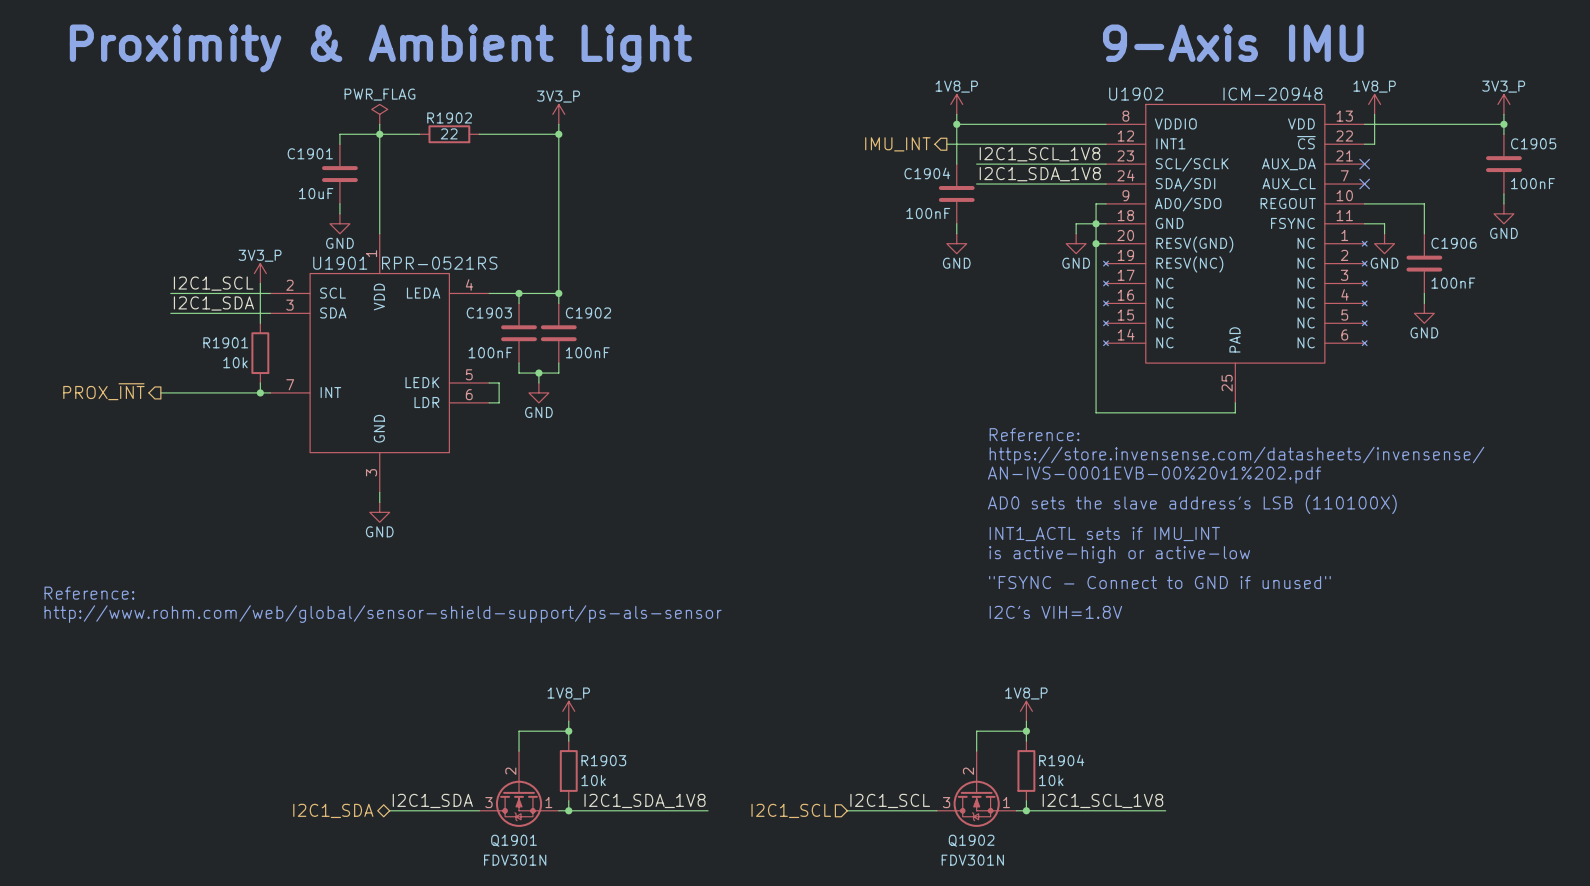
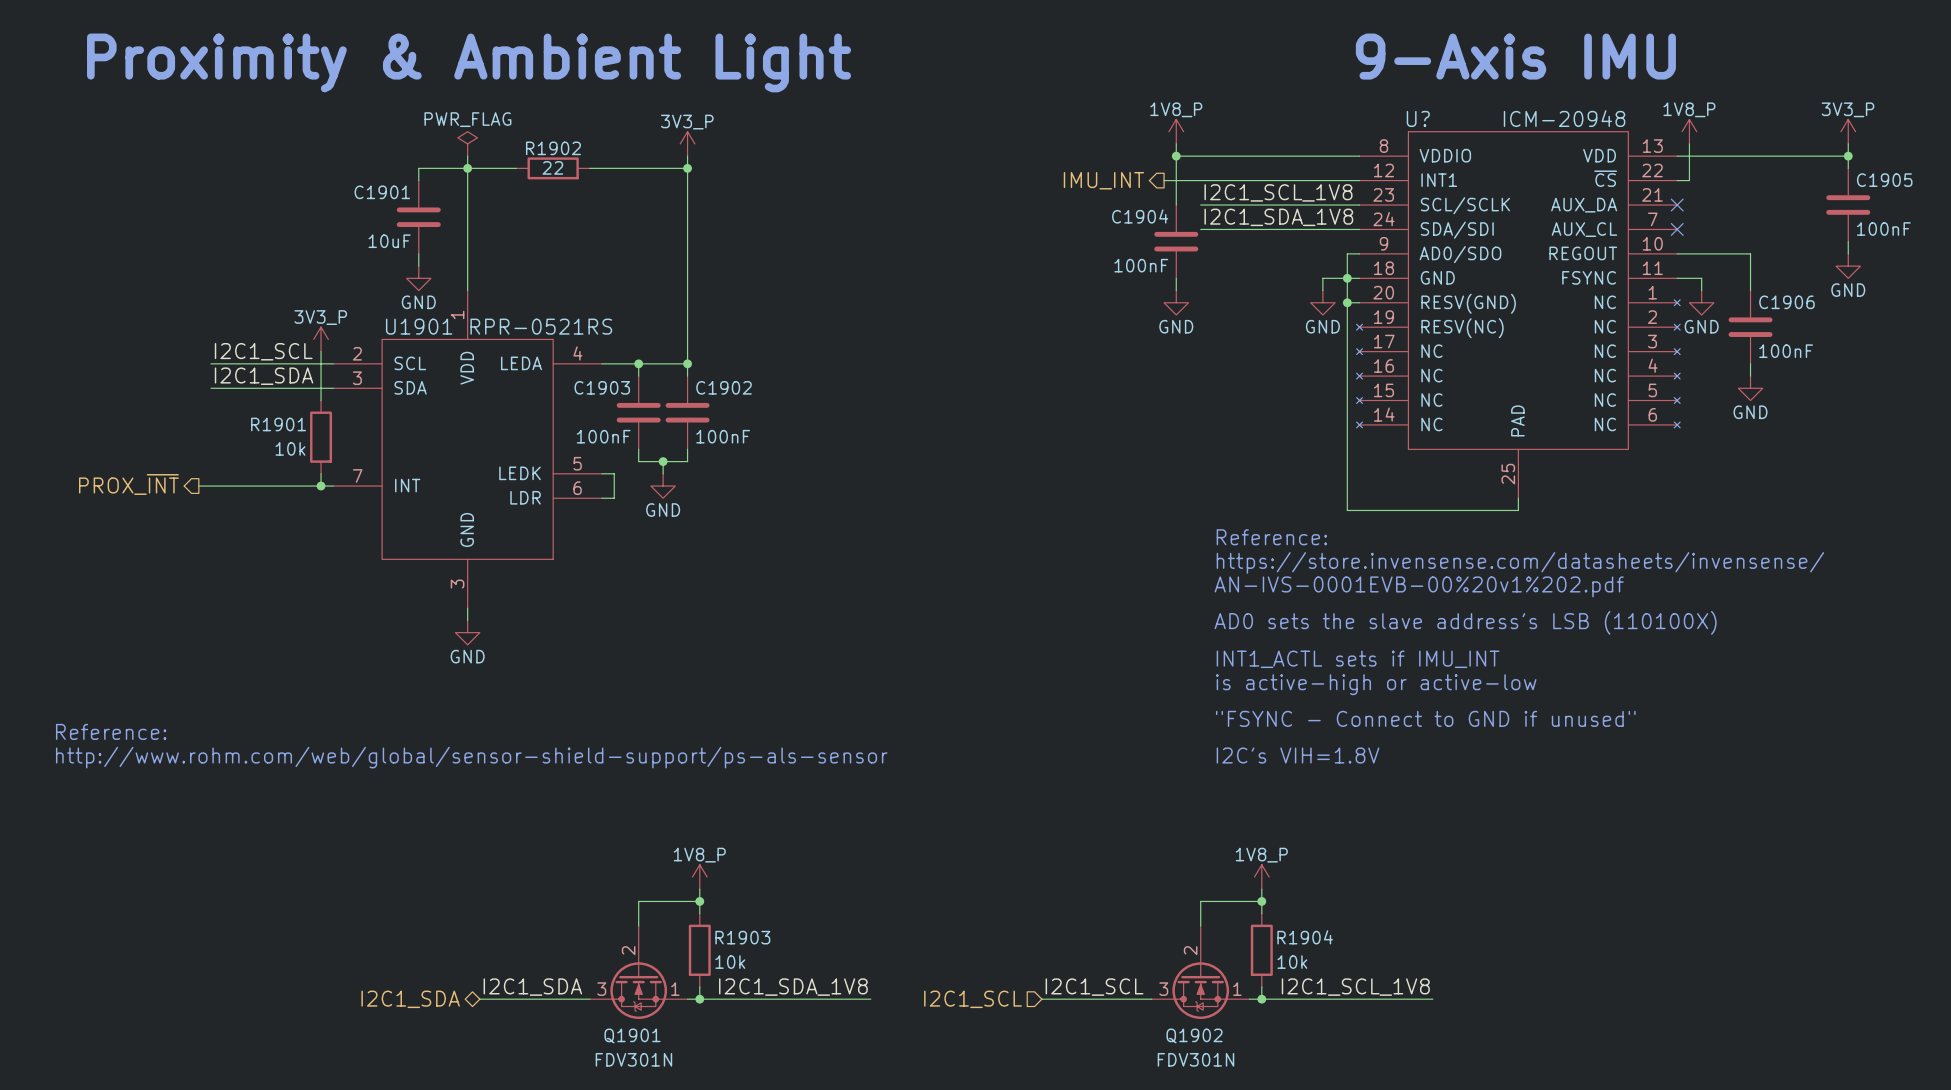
U1902 name: U1902 (1136, 94) -> U? (1418, 118)

